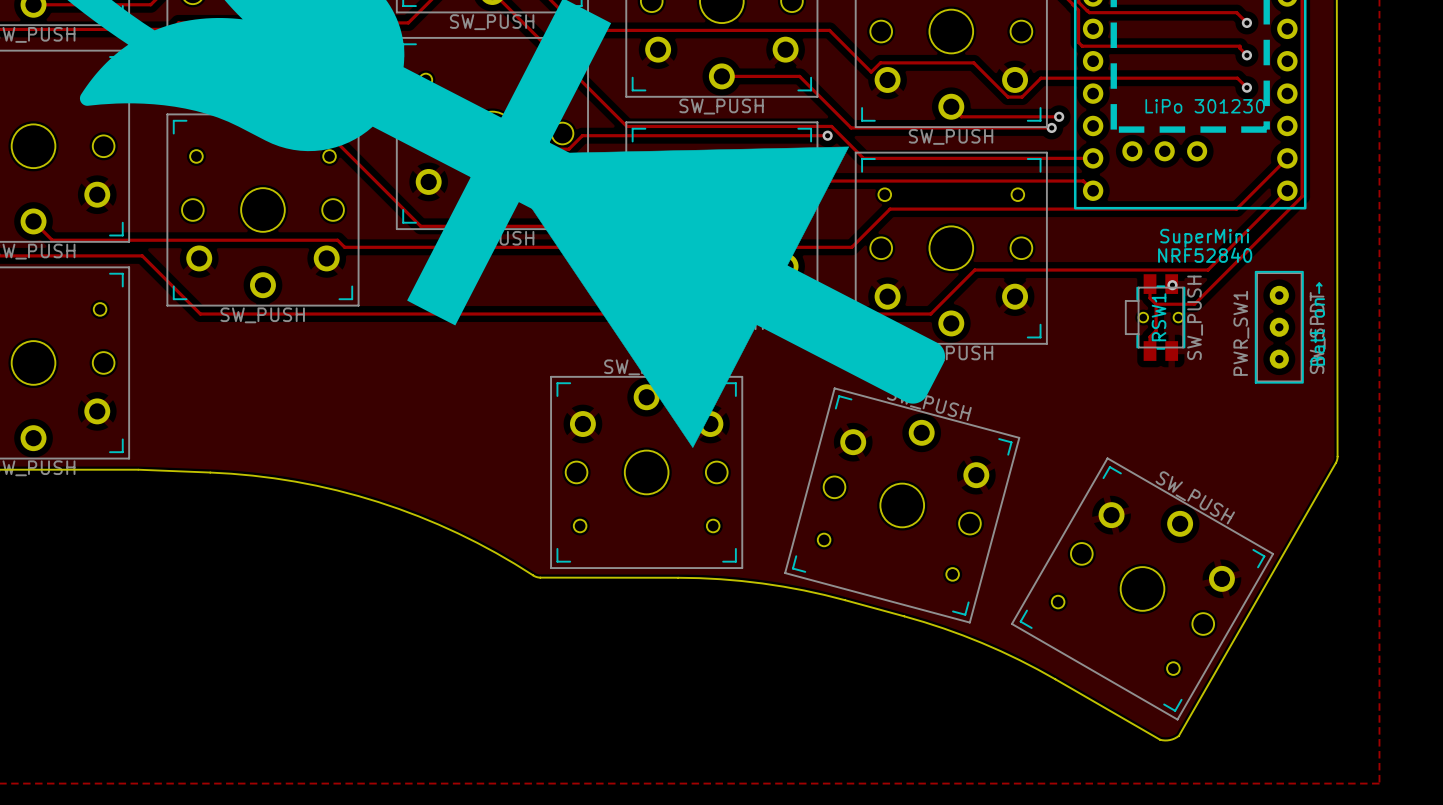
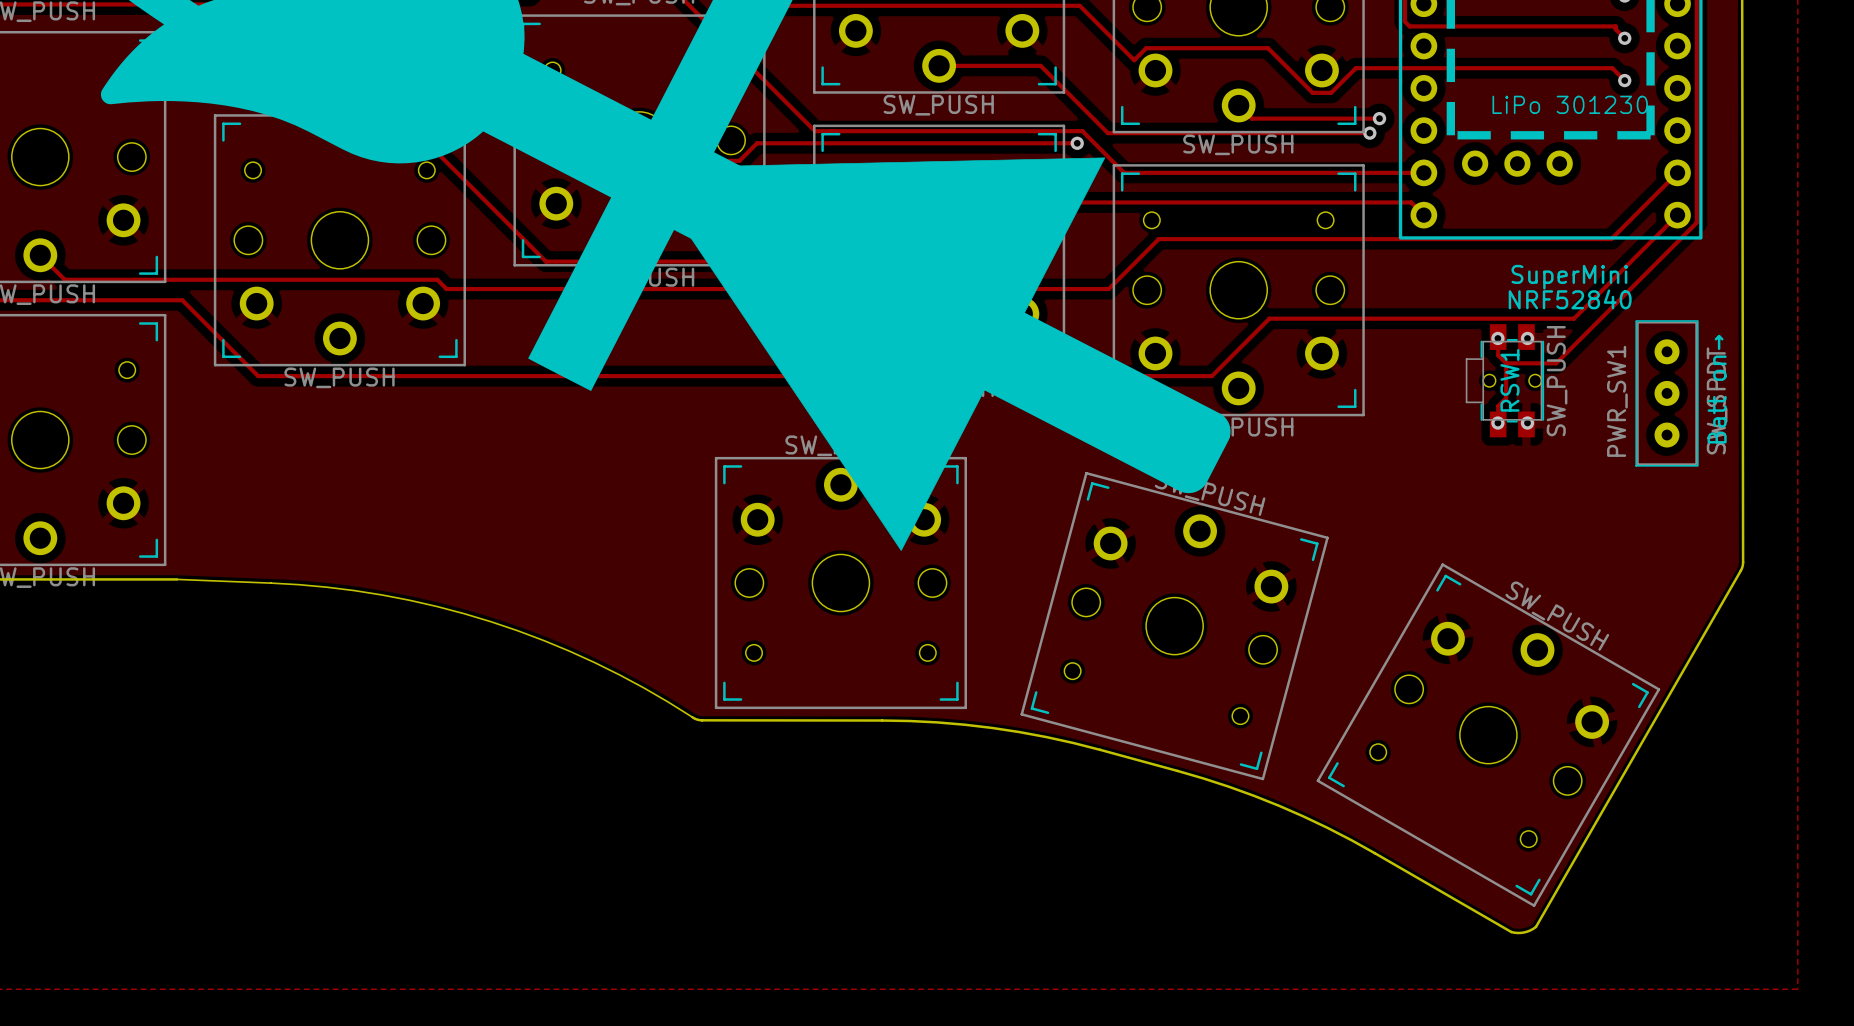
via: none -> (1497, 338)
via: none -> (1497, 423)
via: none -> (1527, 423)

